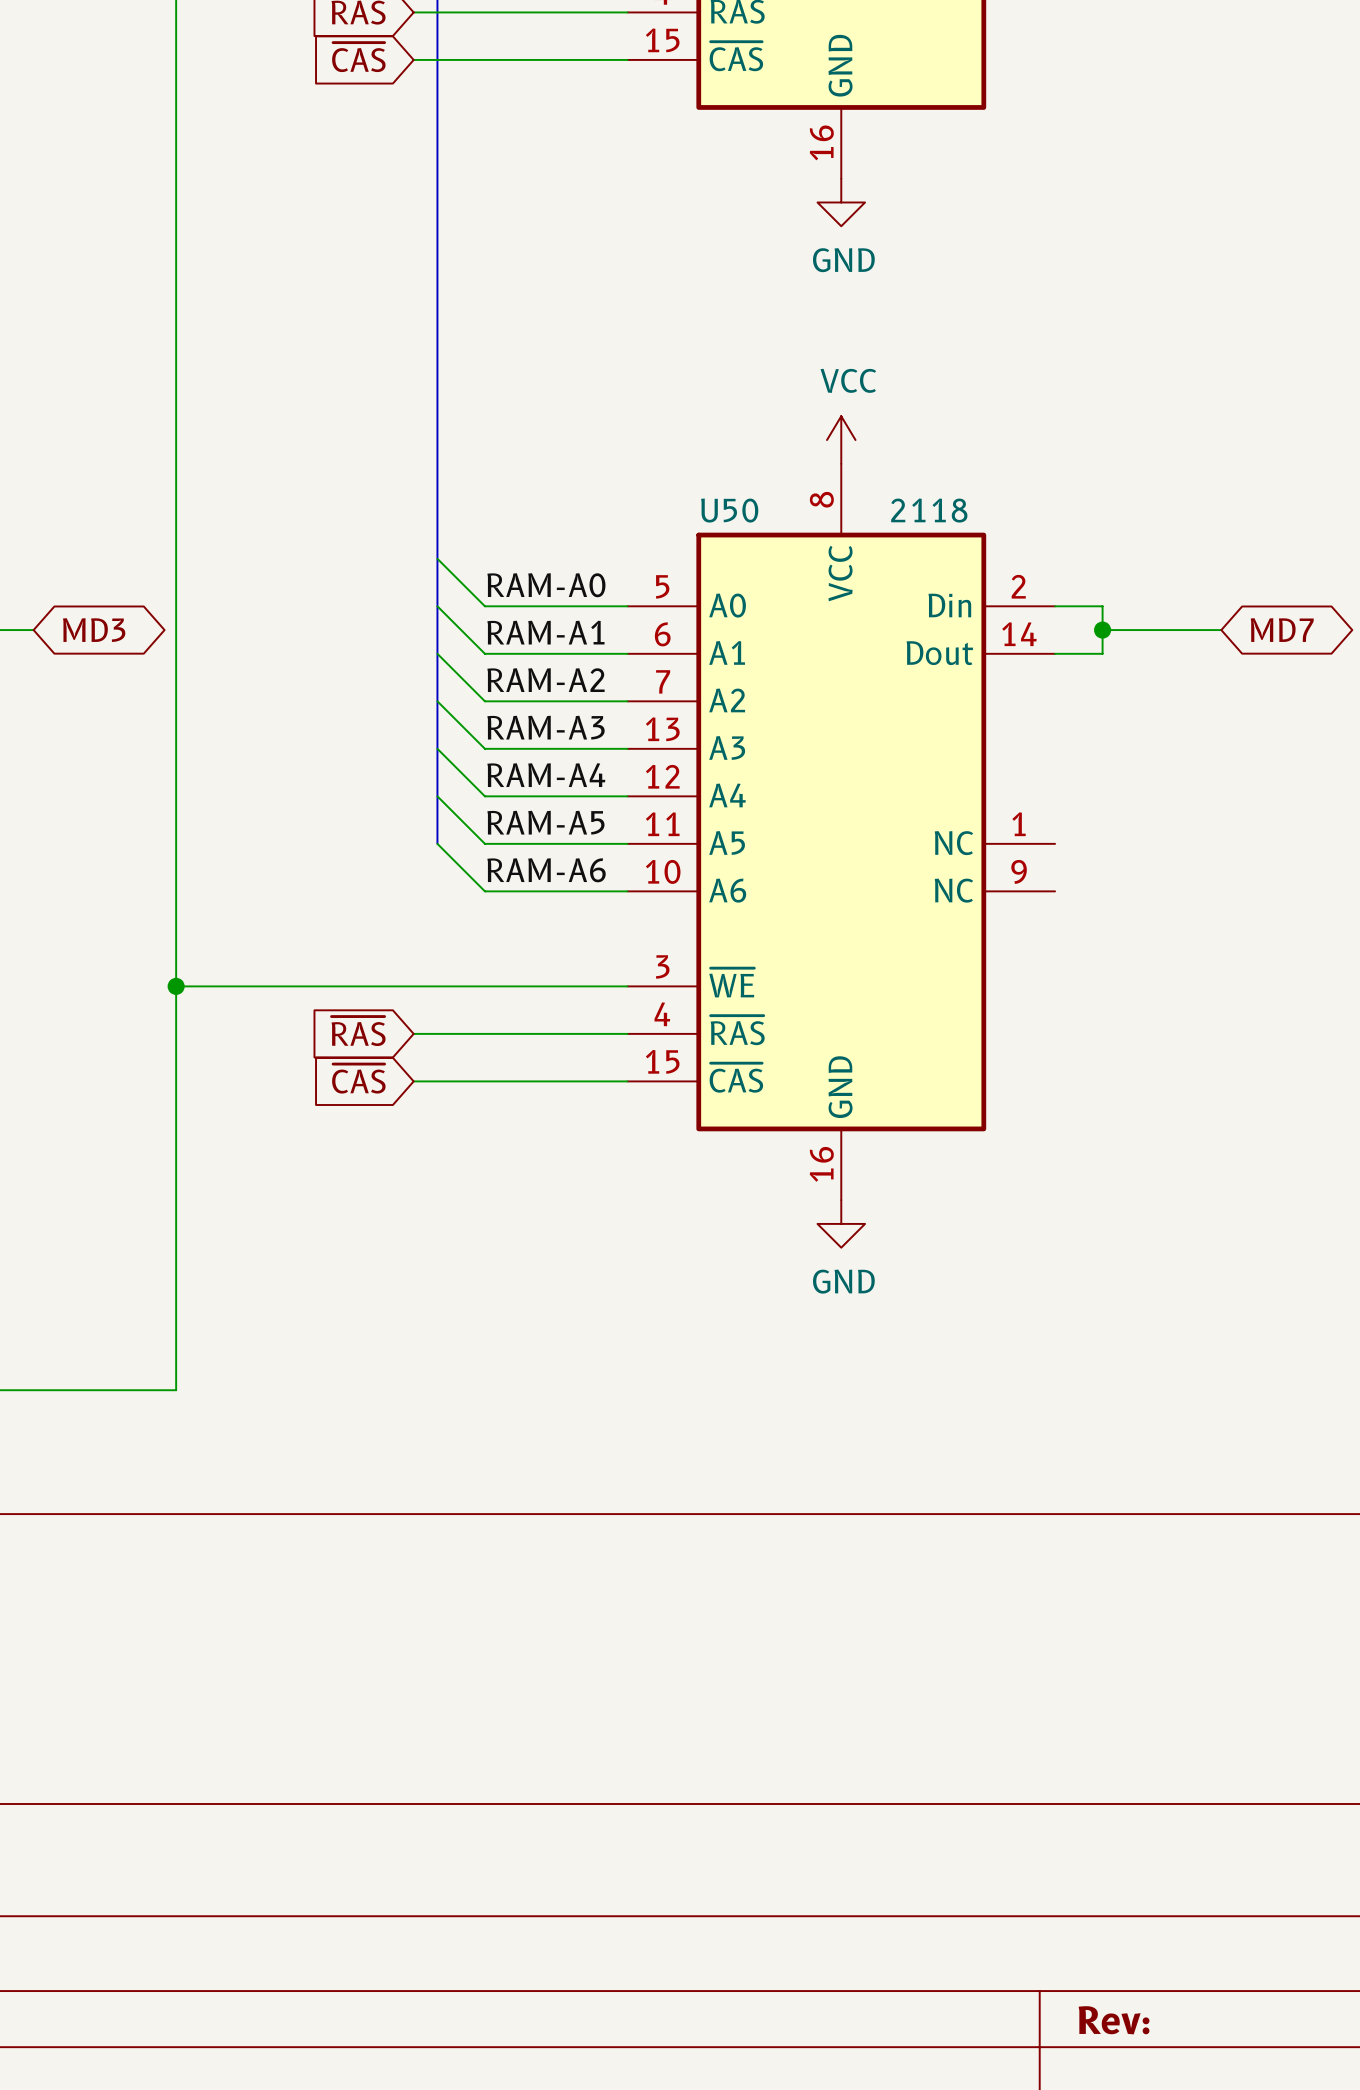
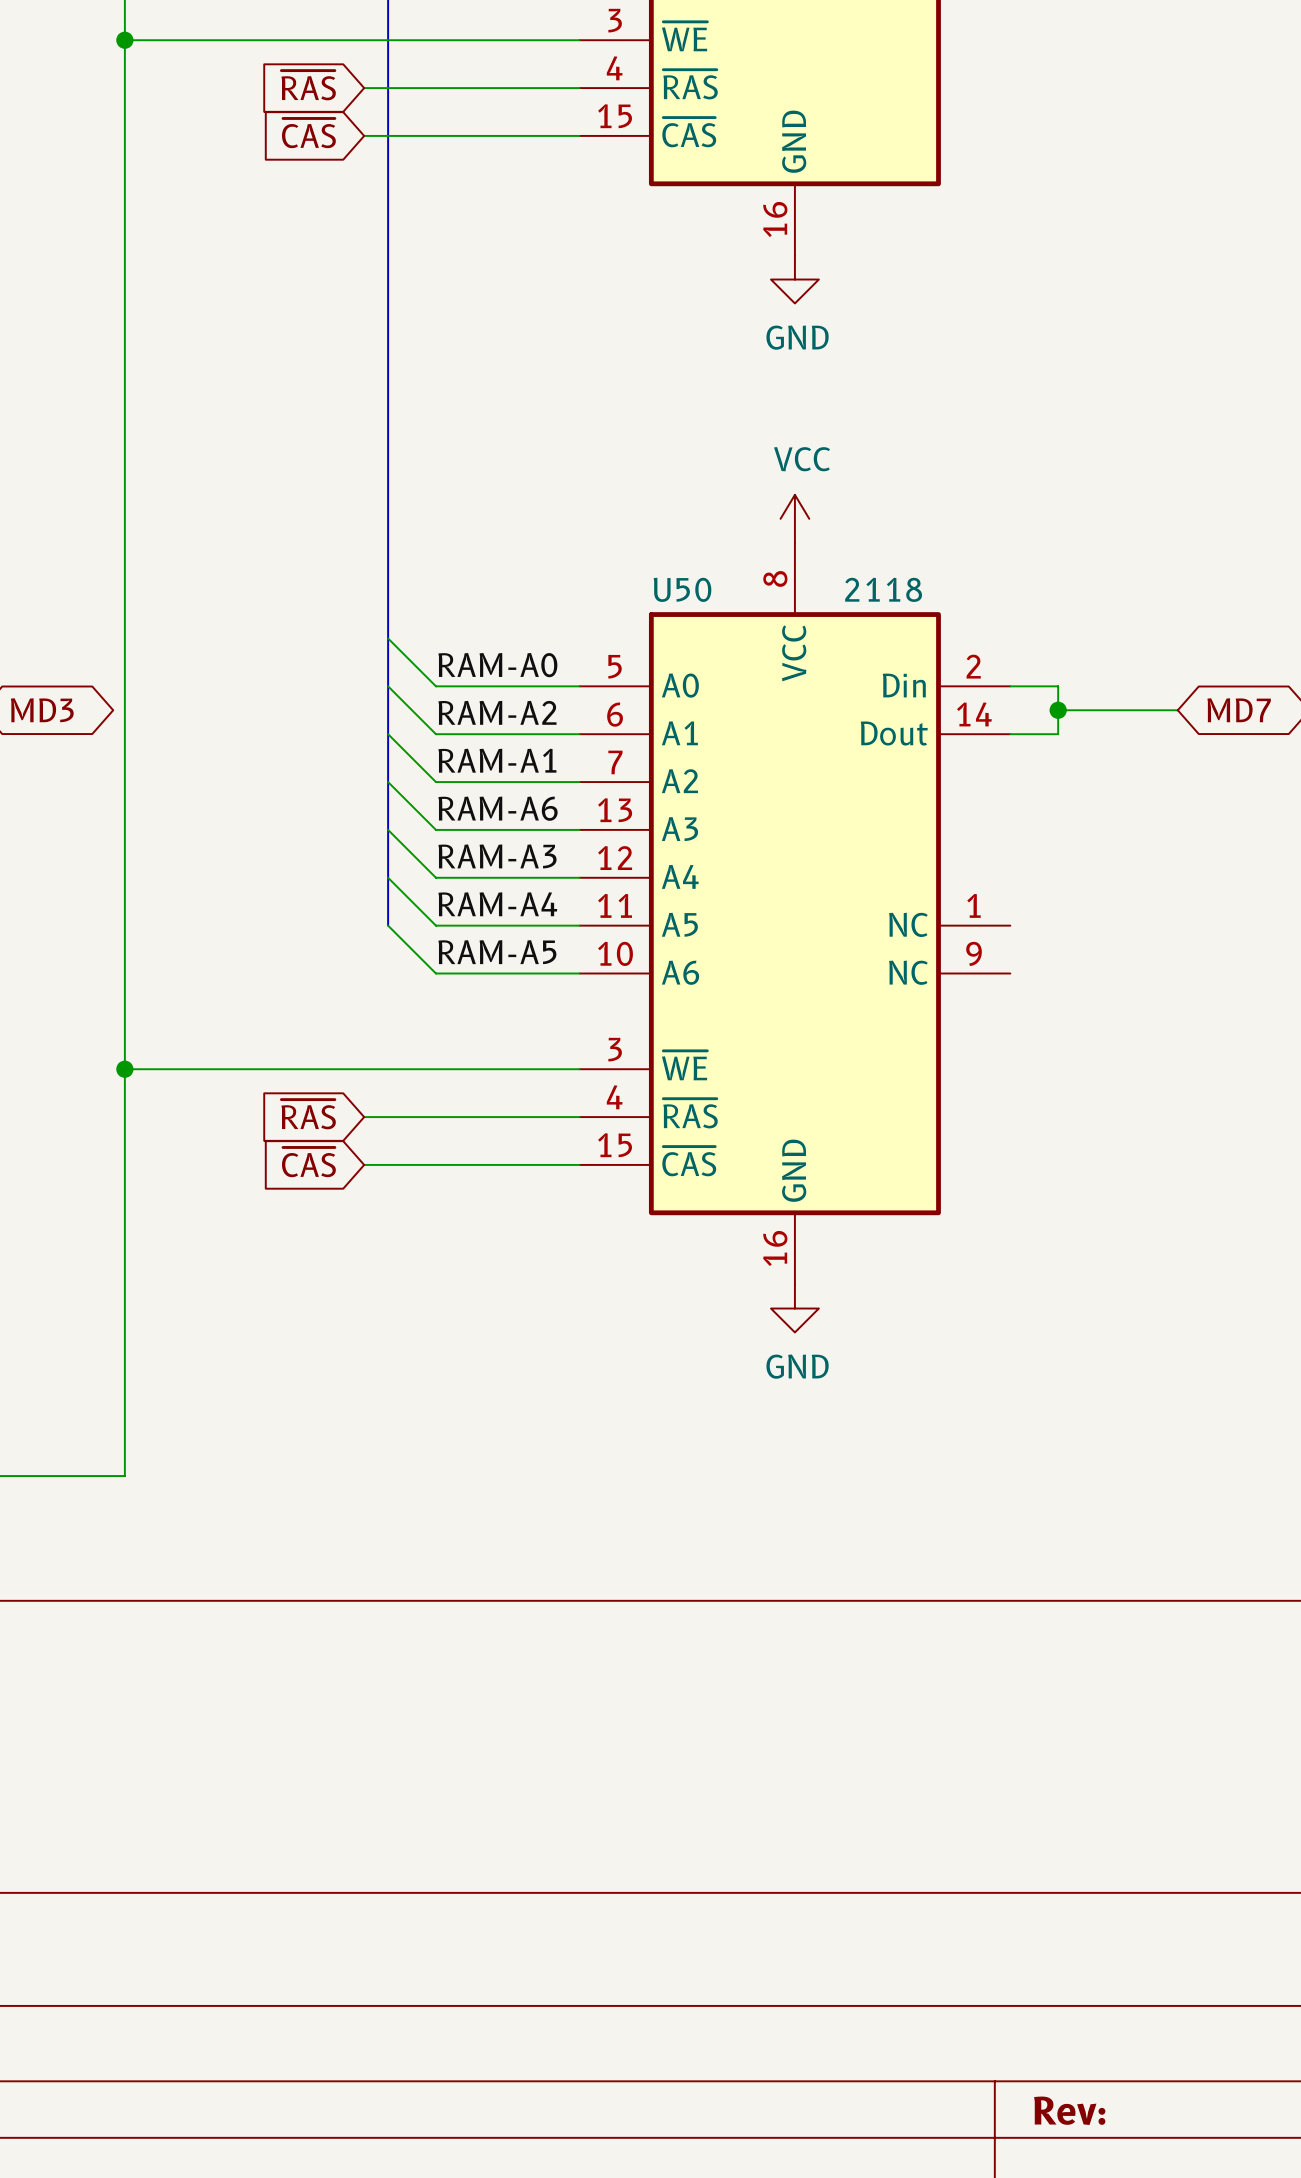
label: RAM-A1 (545, 632) -> RAM-A2 (497, 712)
label: RAM-A2 (545, 680) -> RAM-A1 (497, 760)
label: RAM-A3 (546, 727) -> RAM-A6 (498, 808)
label: RAM-A4 (546, 775) -> RAM-A3 (497, 856)
label: RAM-A5 (545, 822) -> RAM-A4 (497, 904)
label: RAM-A6 (546, 870) -> RAM-A5 (497, 952)

